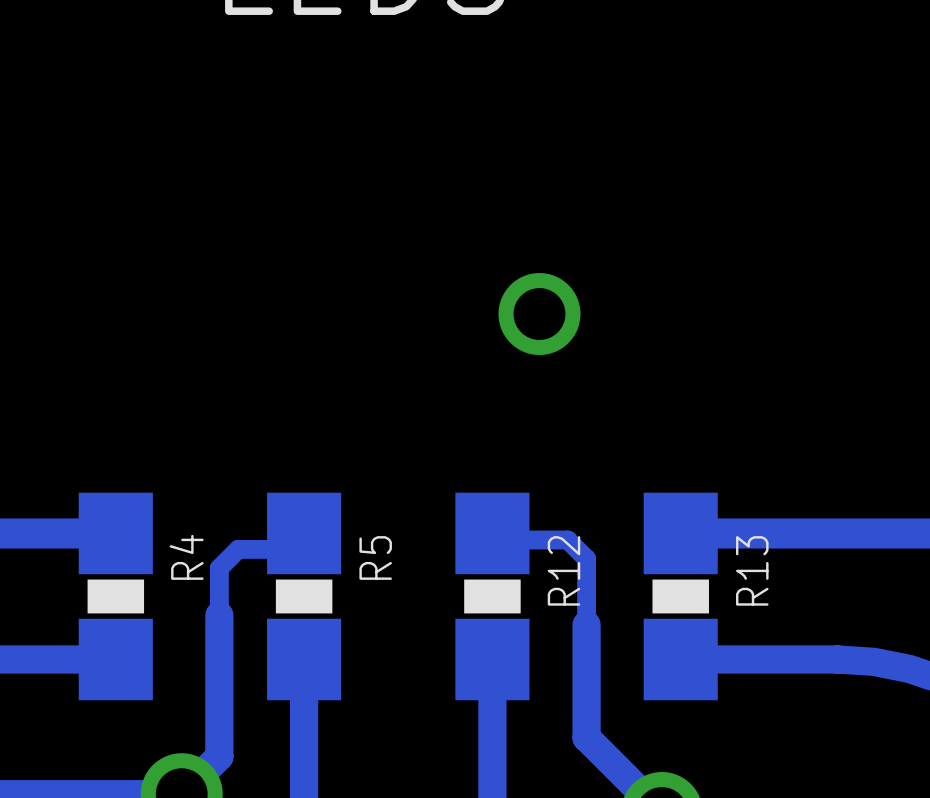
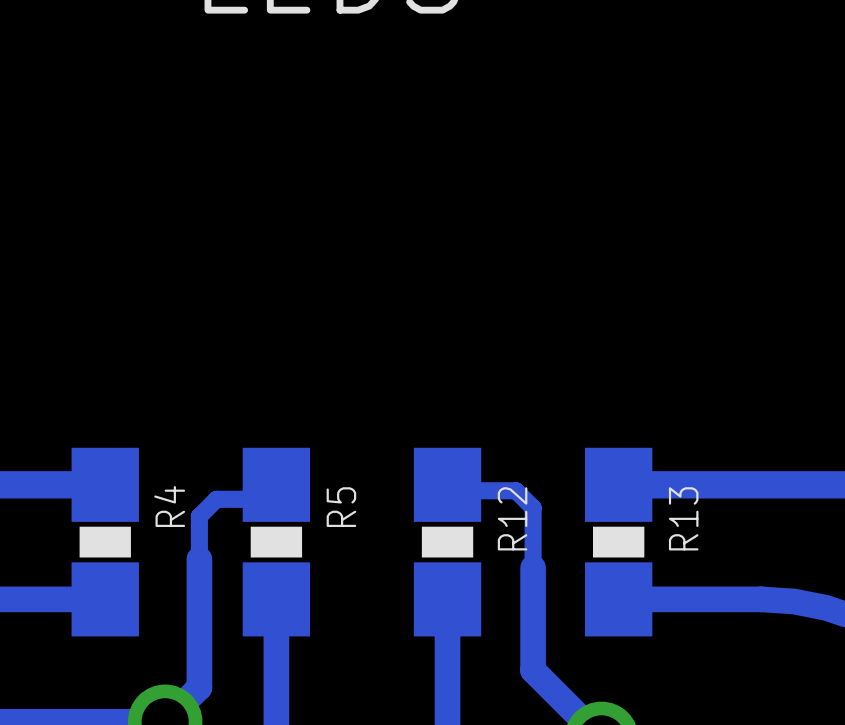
via: (539, 314) -> none

